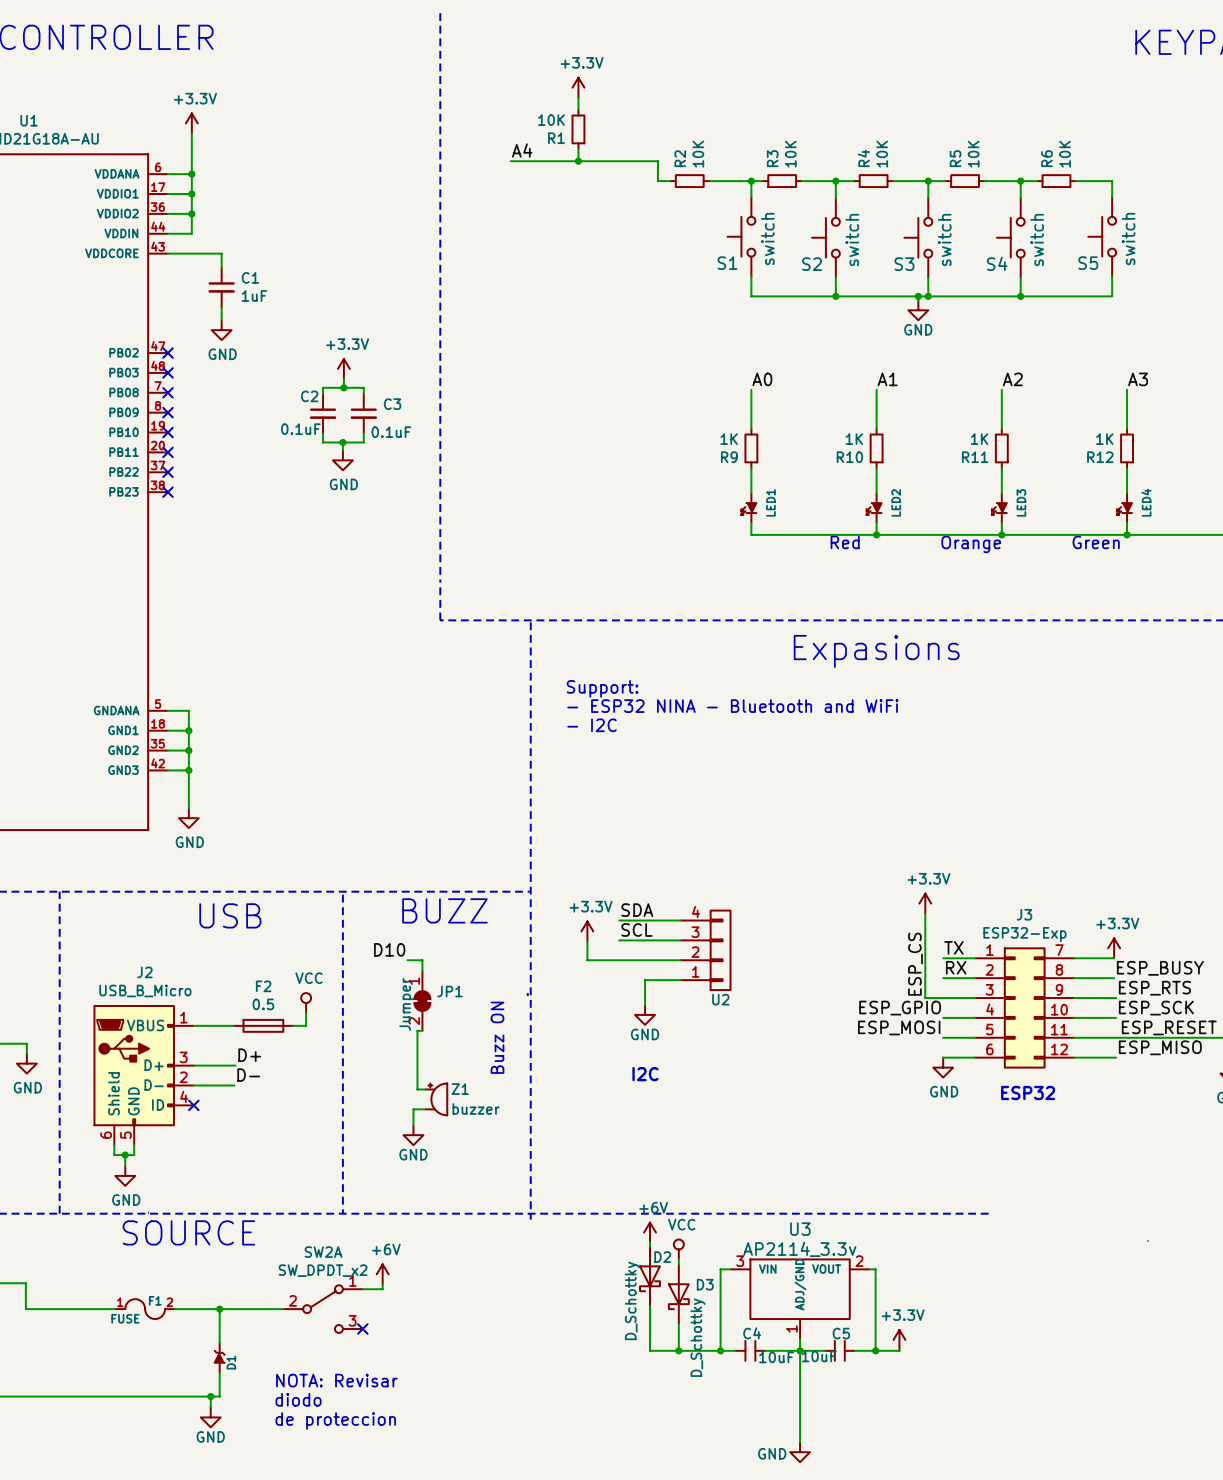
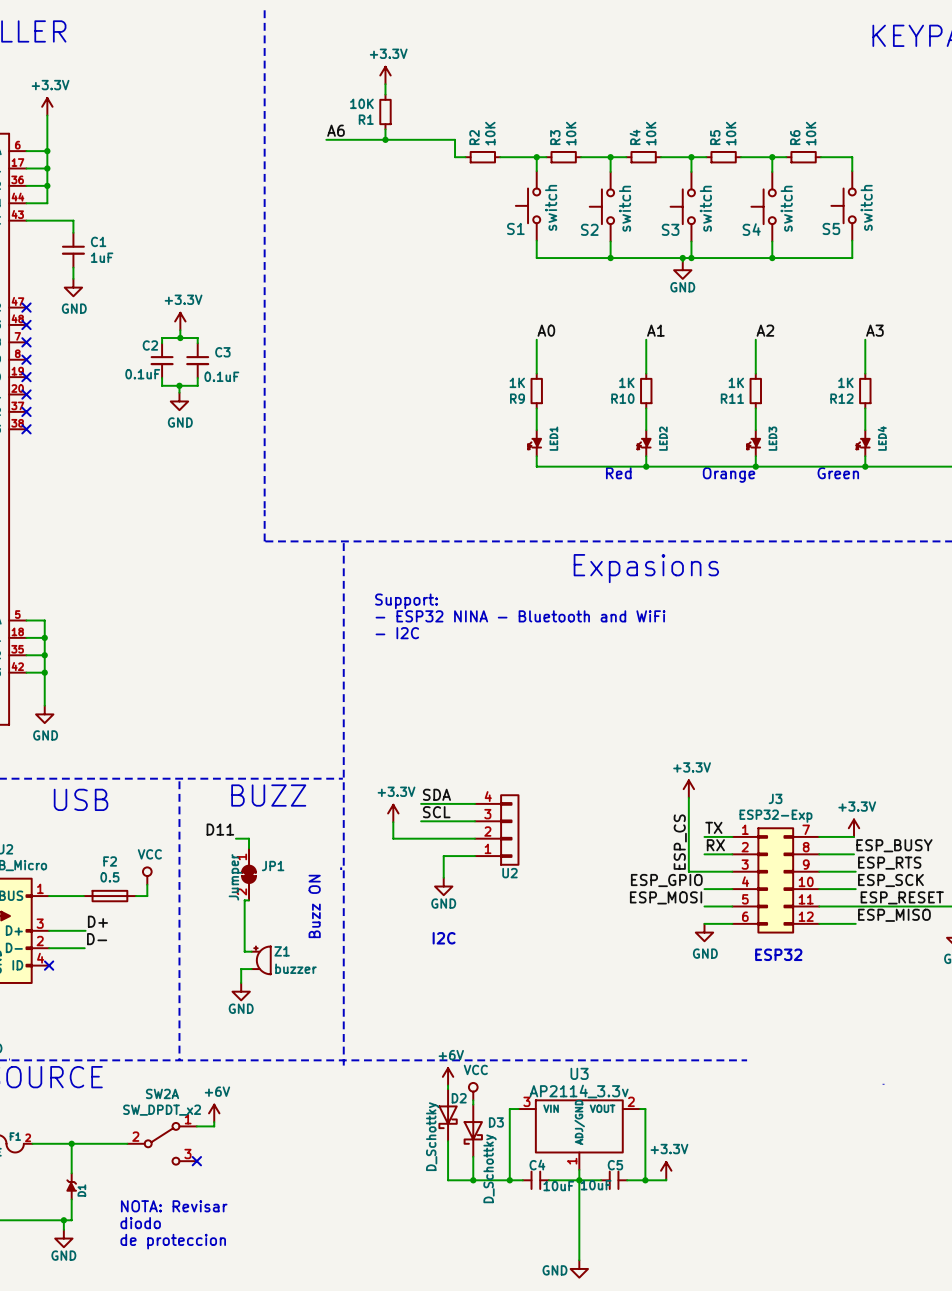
label: A4 (522, 150) -> A6 (336, 130)
label: D10 (389, 949) -> D11 (220, 829)

